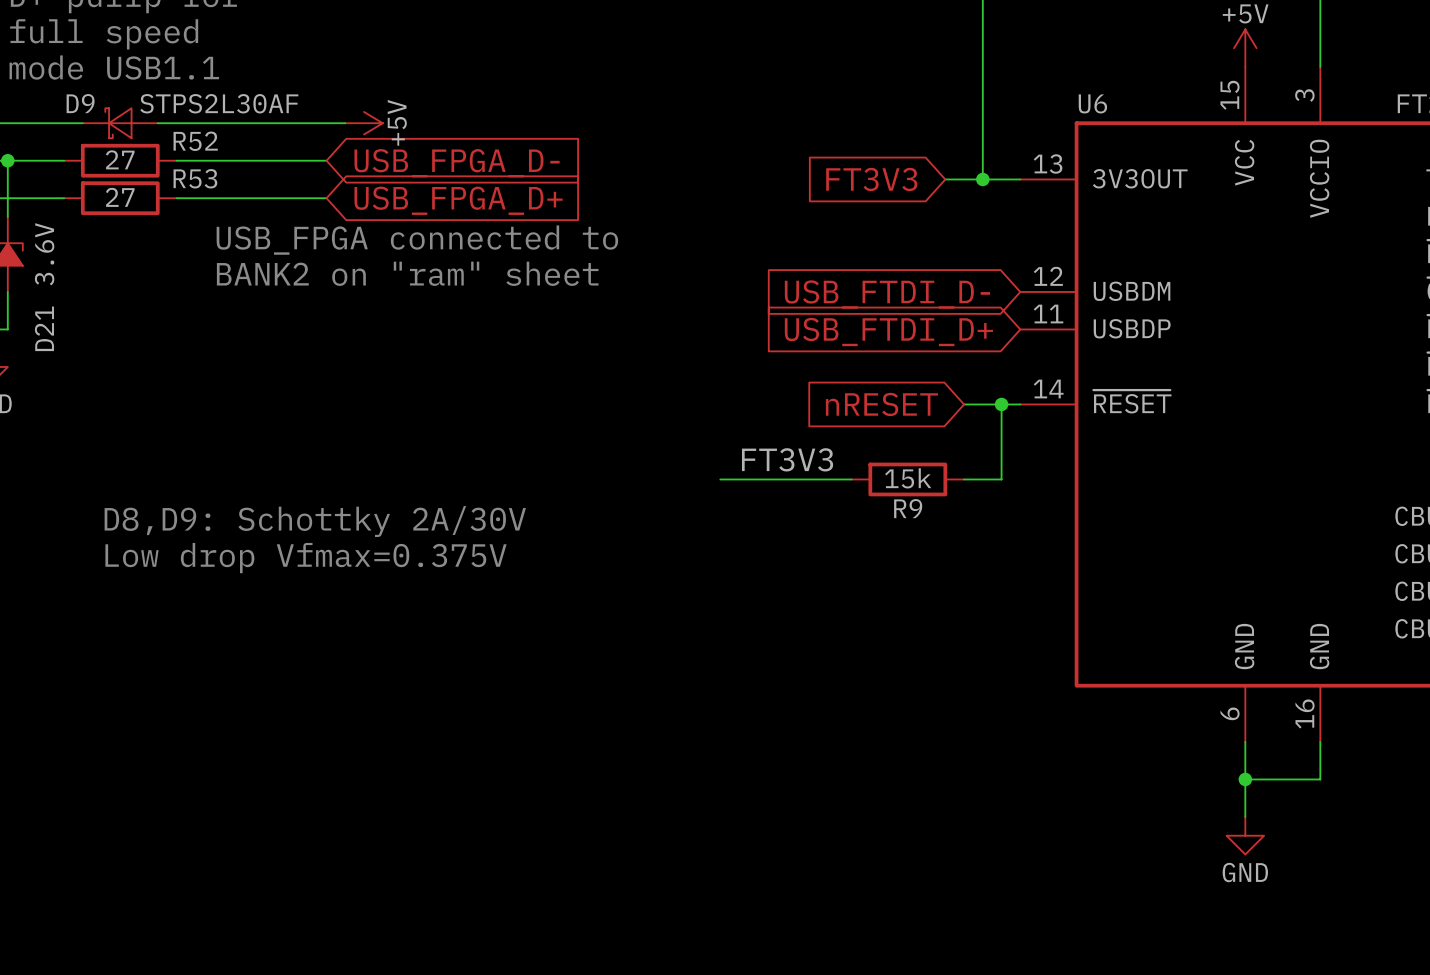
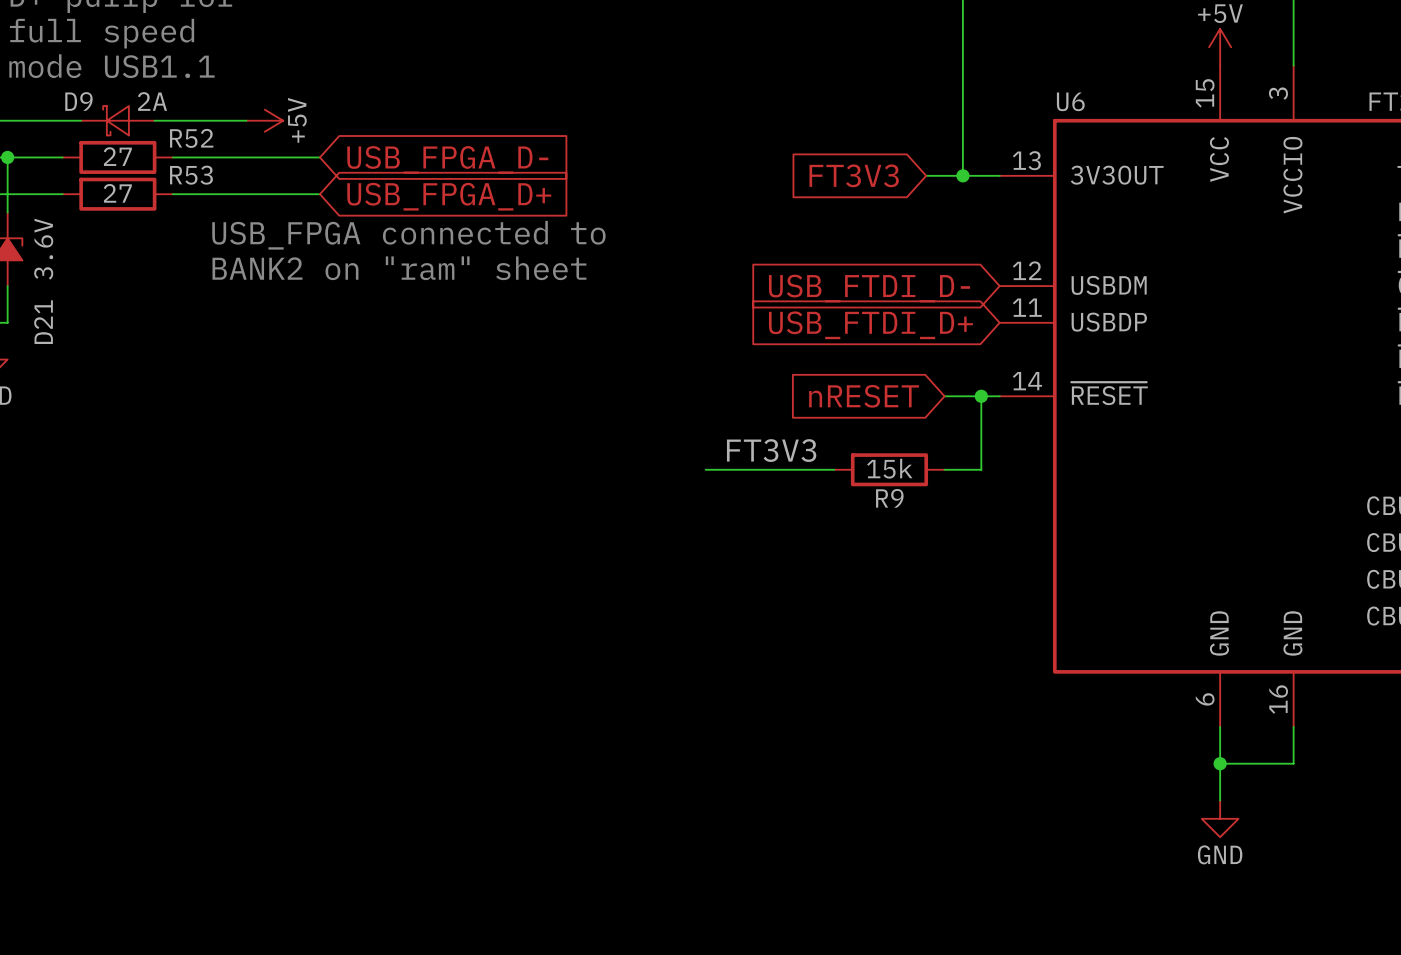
D9 value: STPS2L30AF (219, 103) -> 2A (152, 101)
wire: (251, 123) (345, 123) -> none
power symbol position: +5V (364, 123) -> +5V (264, 120)
text: D8,D9: Schottky 2A/30V (315, 521) -> none
text: Low drop Vfmax=0.375V (306, 558) -> none

